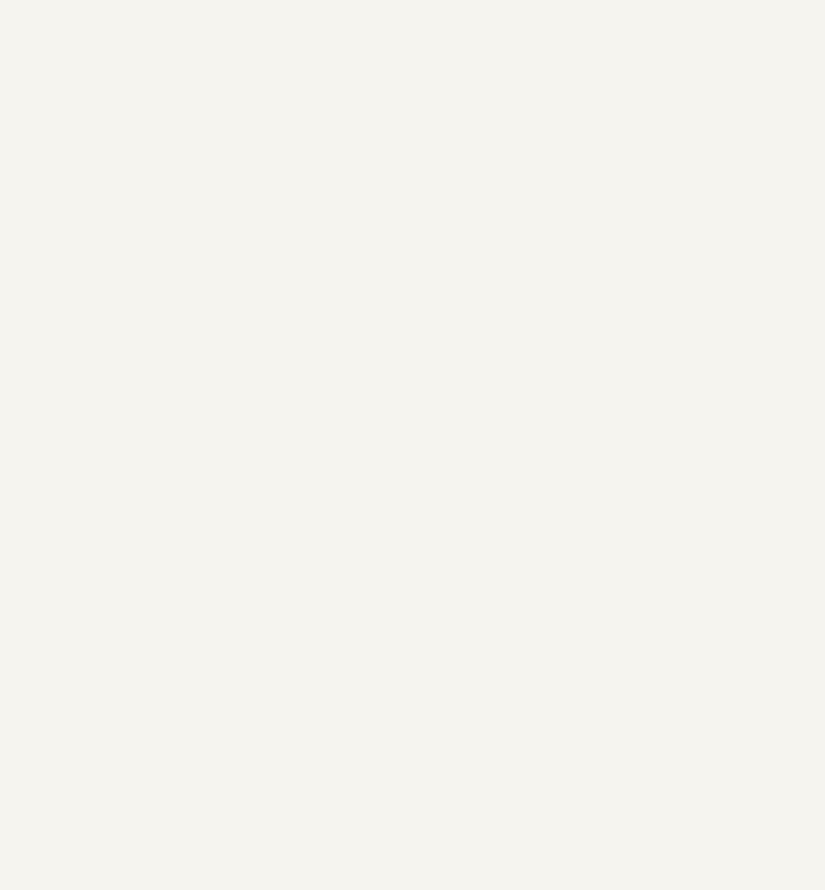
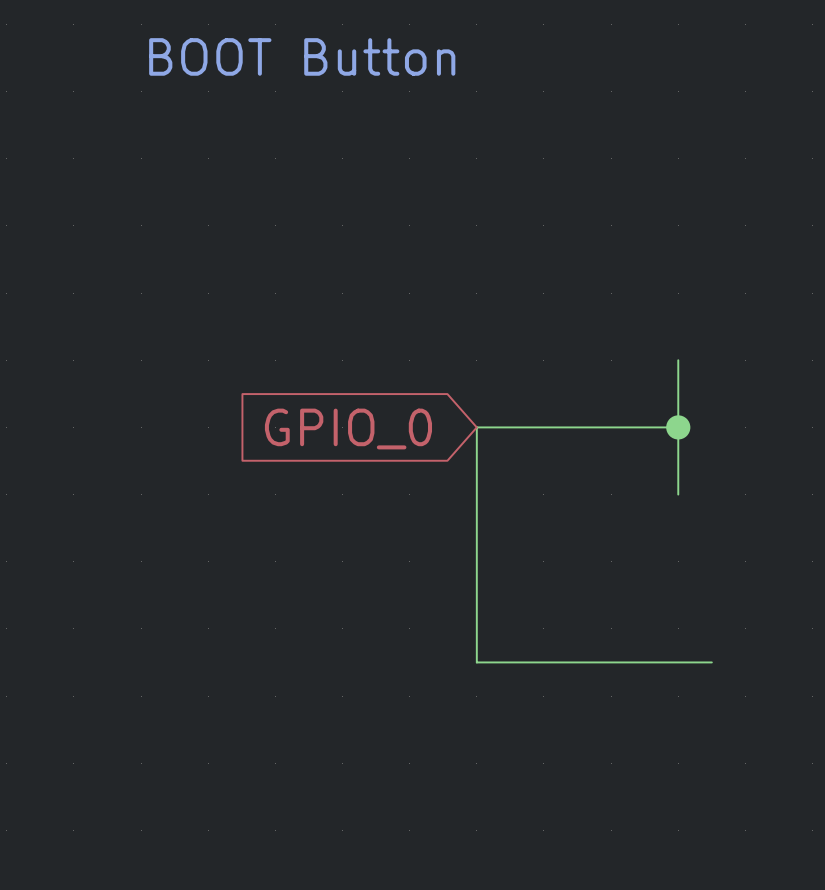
text: none -> BOOT Button (302, 56)
wire: none -> (678, 360) (678, 494)
wire: none -> (678, 427) (476, 427) (476, 662) (711, 662)
junction: none -> (678, 427)
global label: none -> GPIO_0 (348, 429)

